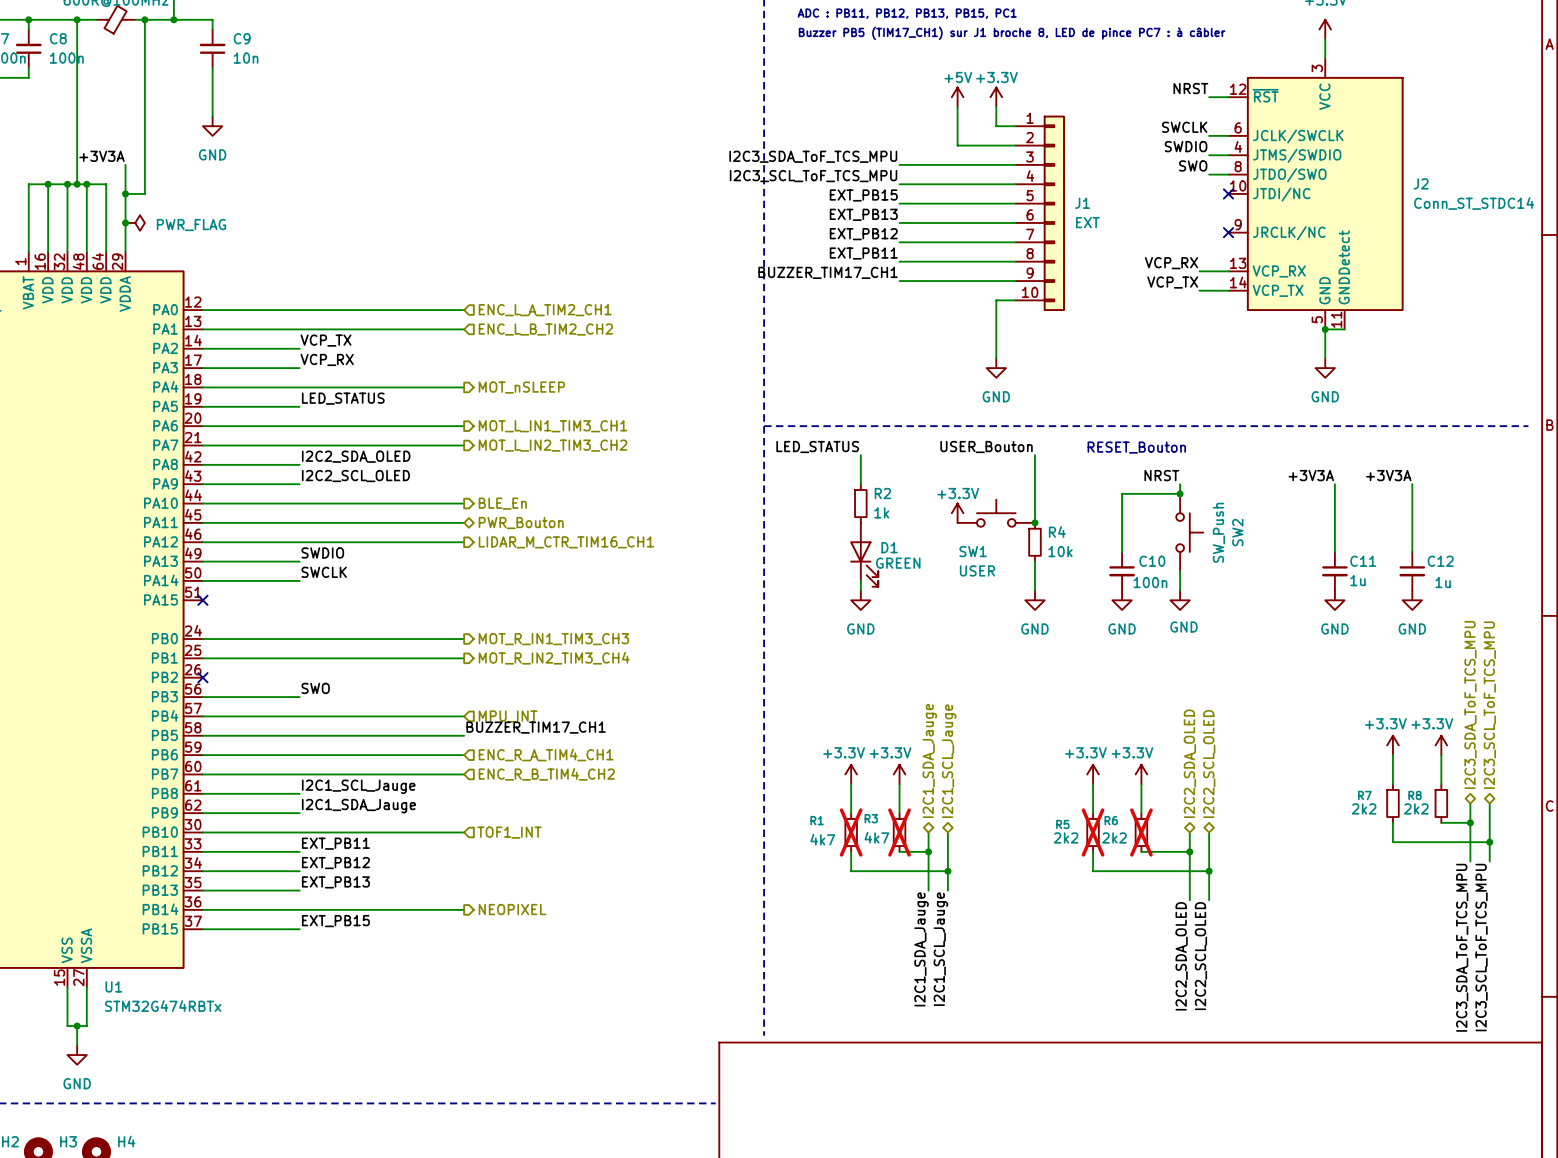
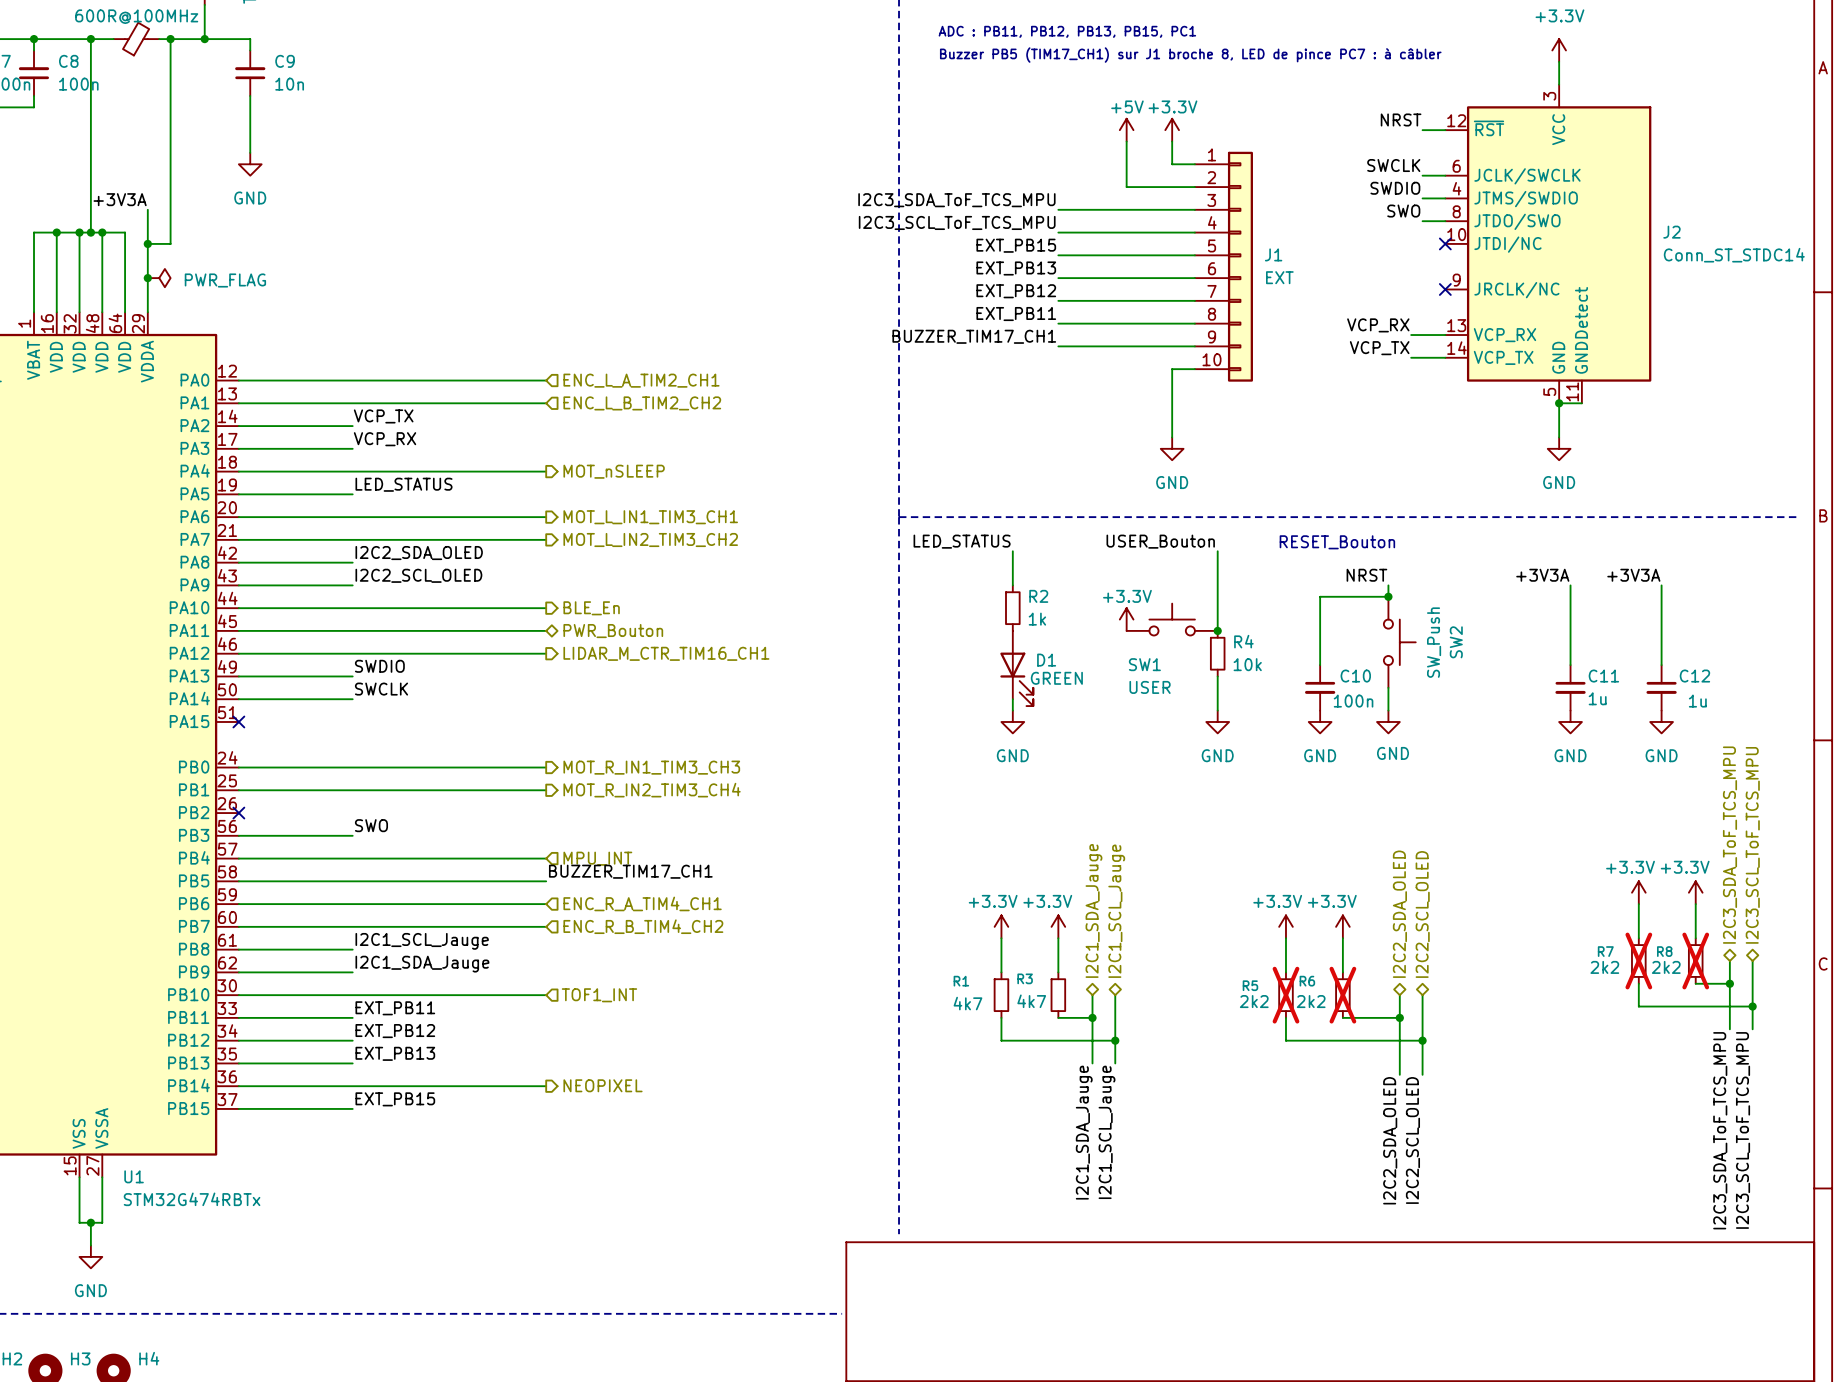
R7 do-not-place cross: none -> (1638, 961)
R8 do-not-place cross: none -> (1695, 961)
R1 do-not-place cross: (851, 832) -> none
R3 do-not-place cross: (899, 832) -> none

